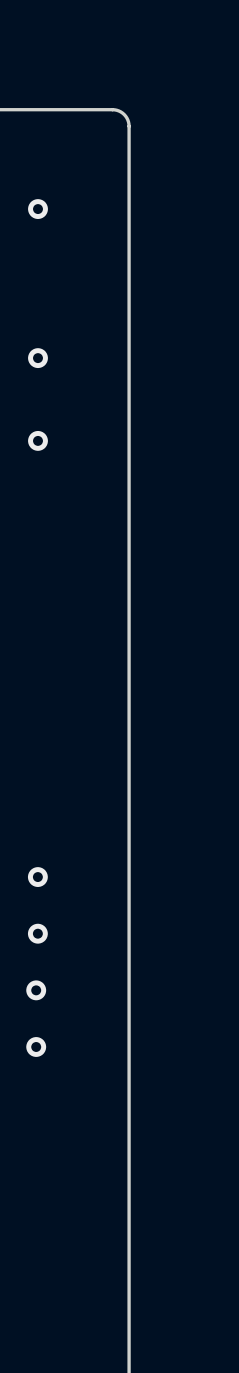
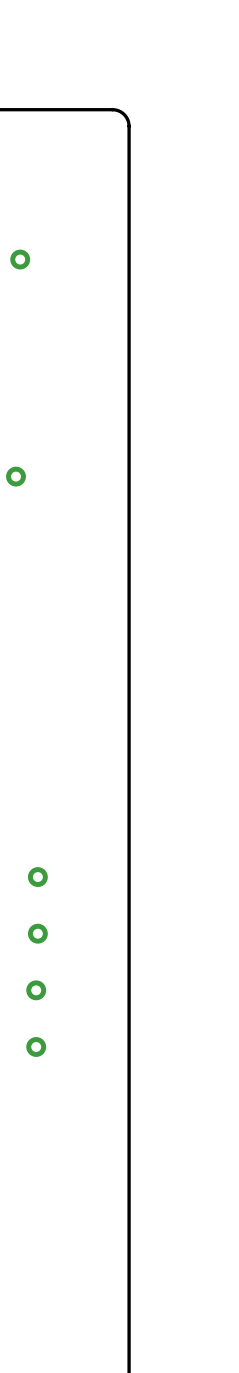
via: (37, 209) -> none
via: none -> (20, 259)
via: (37, 358) -> none
via position: (37, 440) -> (16, 476)

